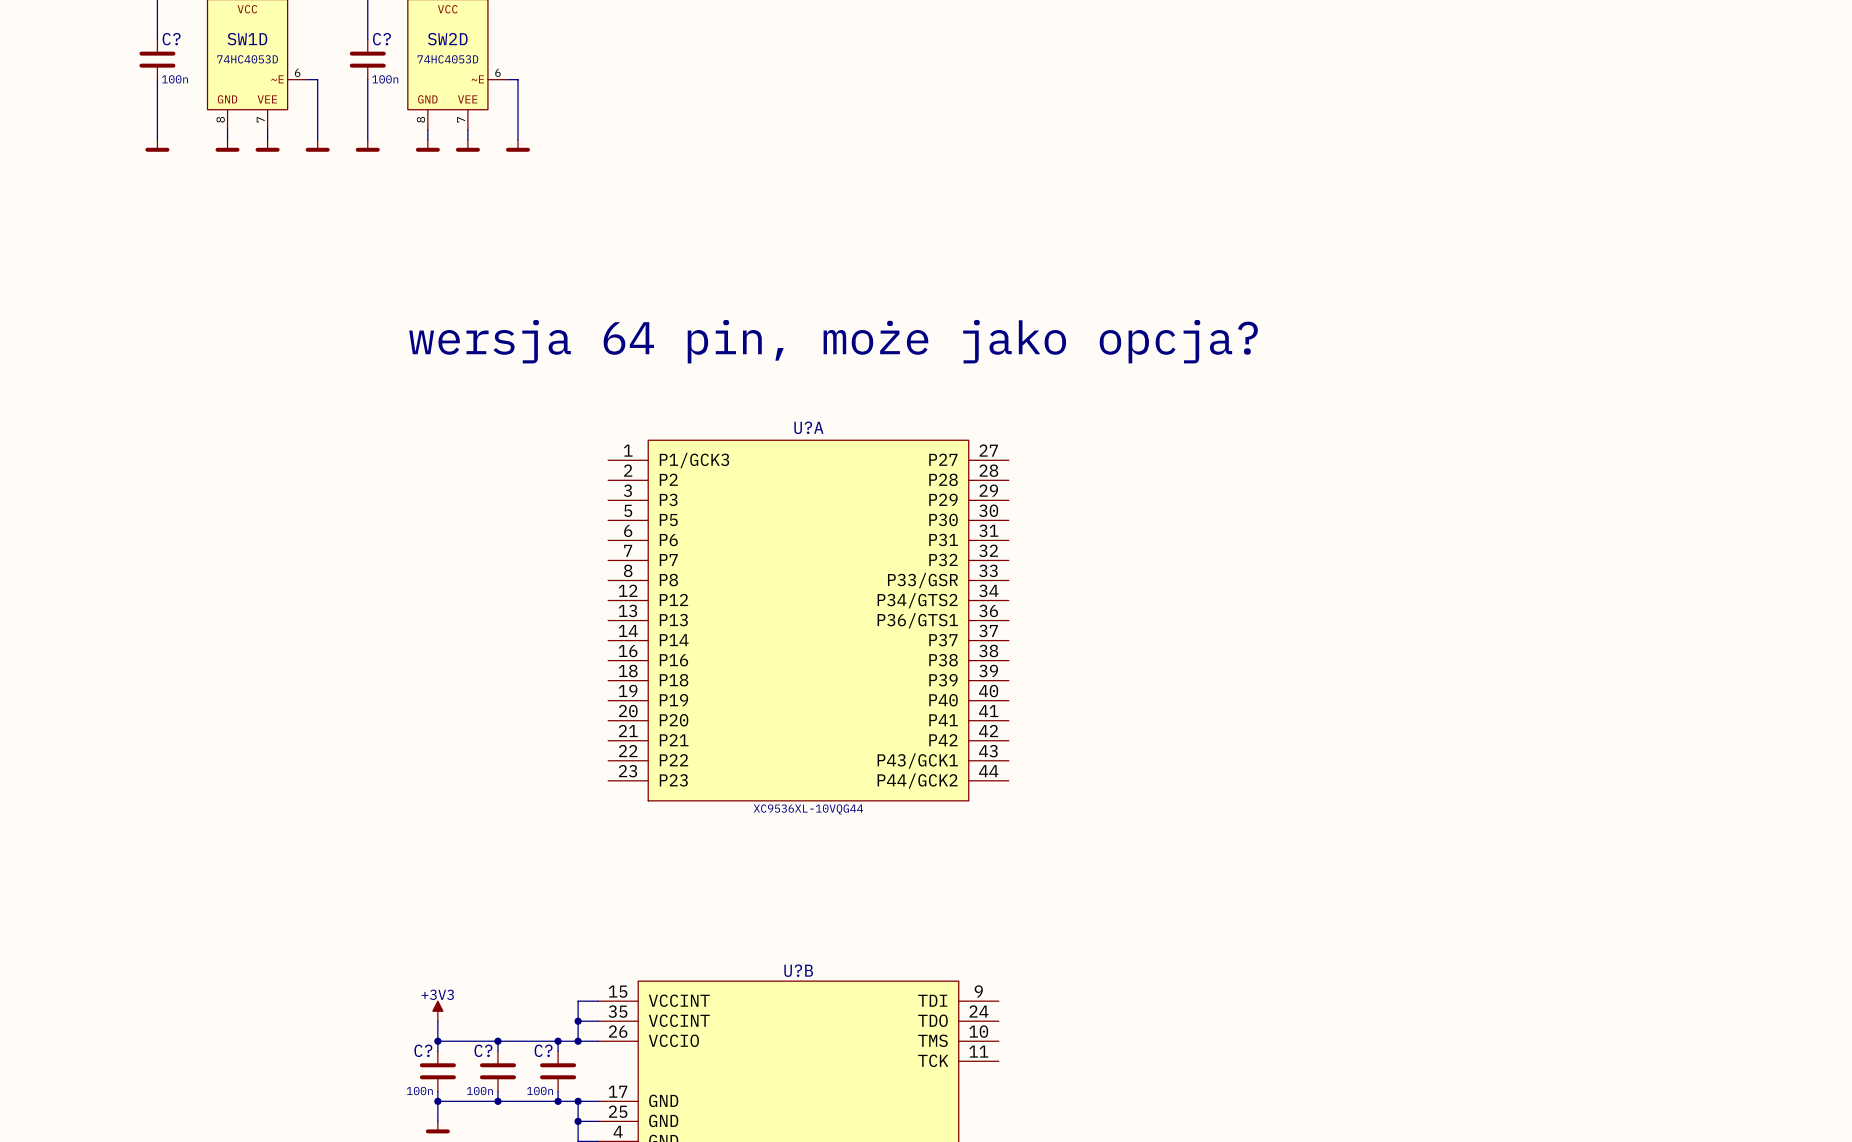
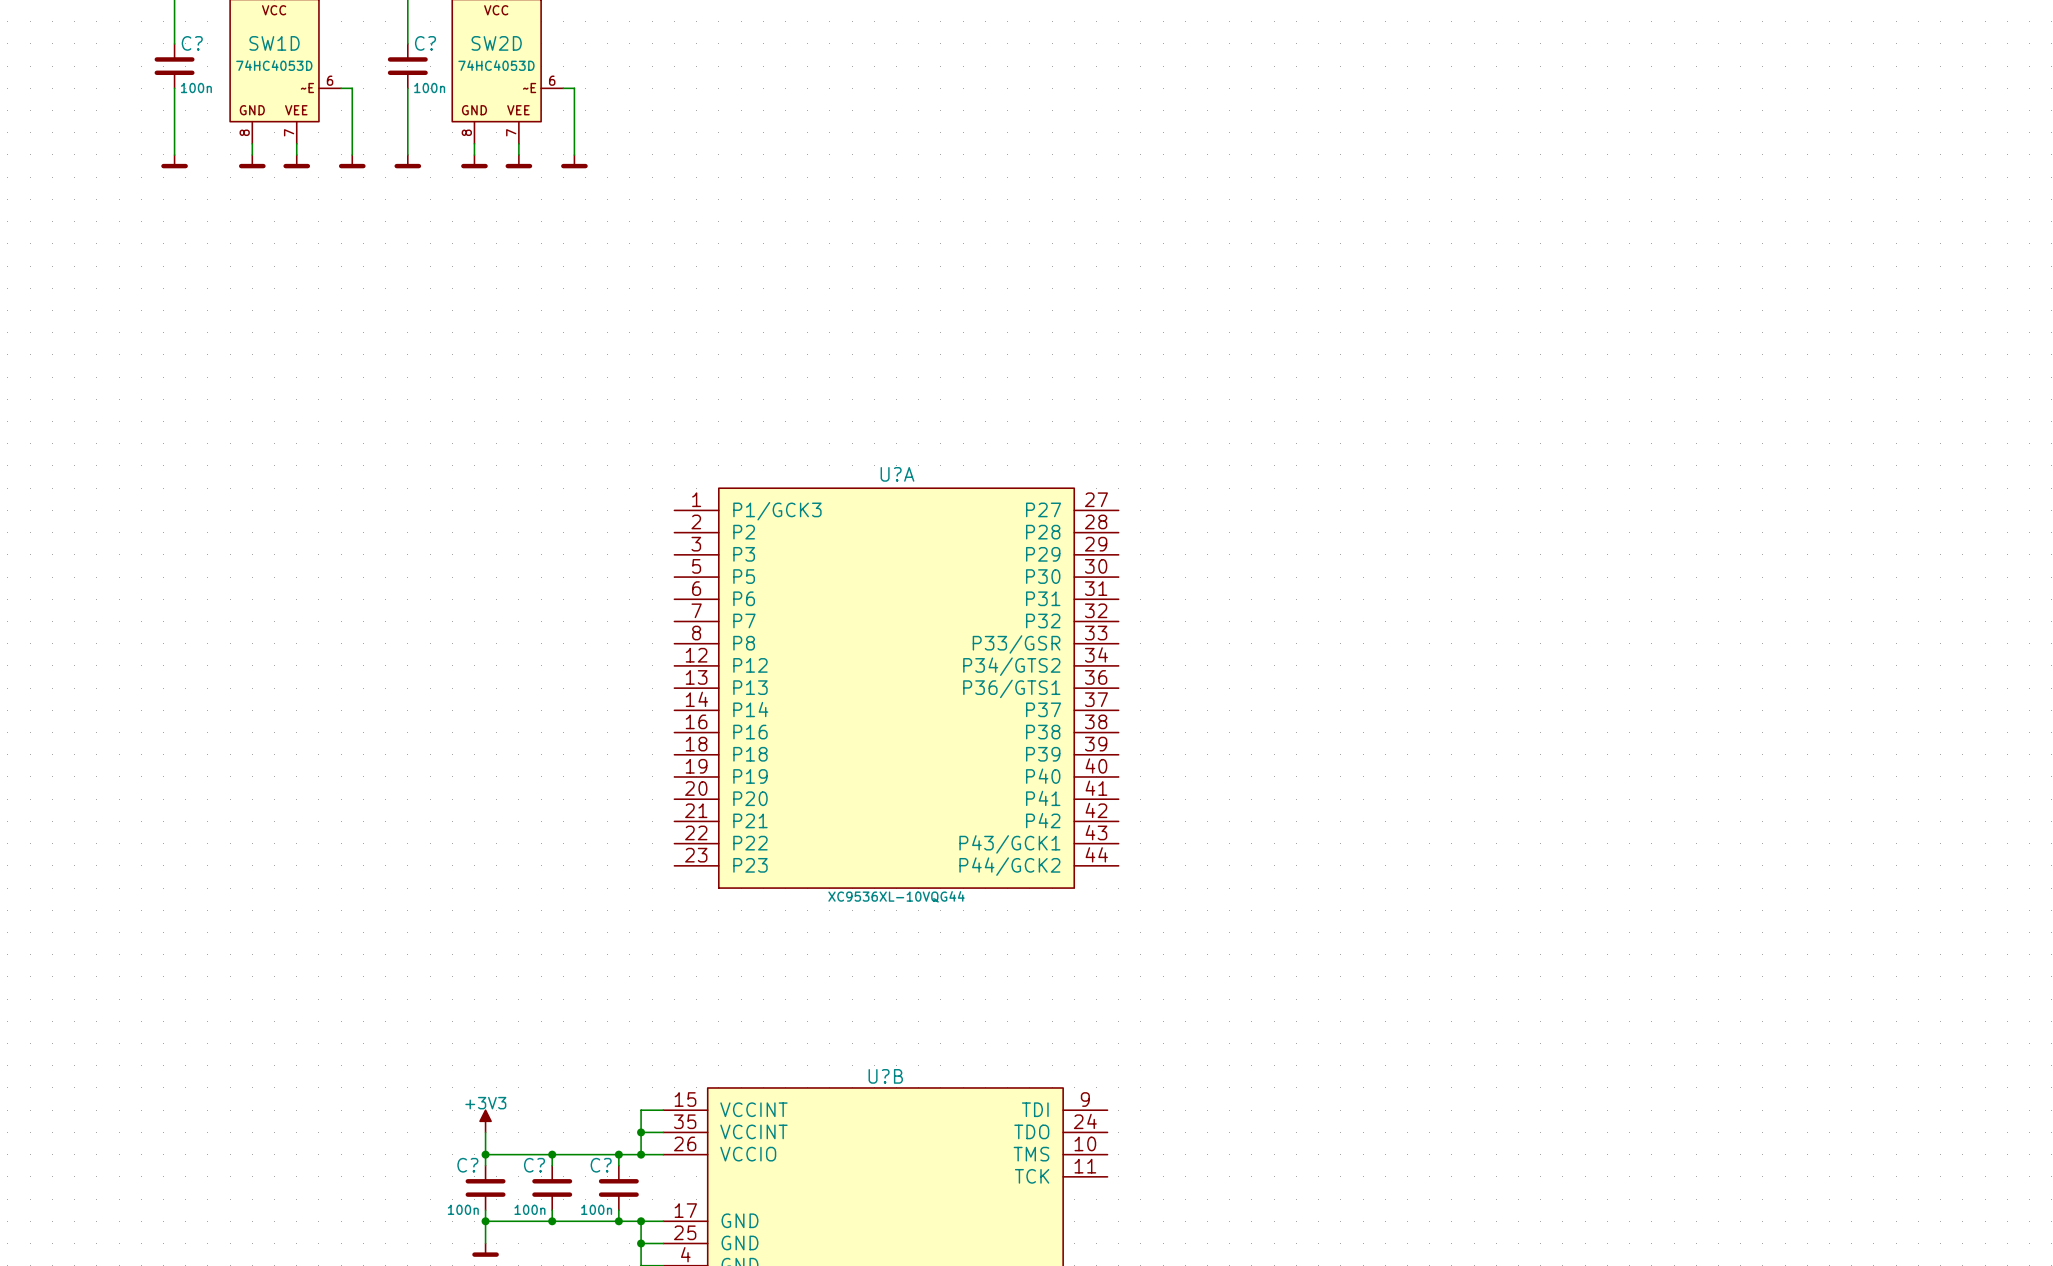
text: wersja 64 pin, może jako opcja? (833, 341) -> none

